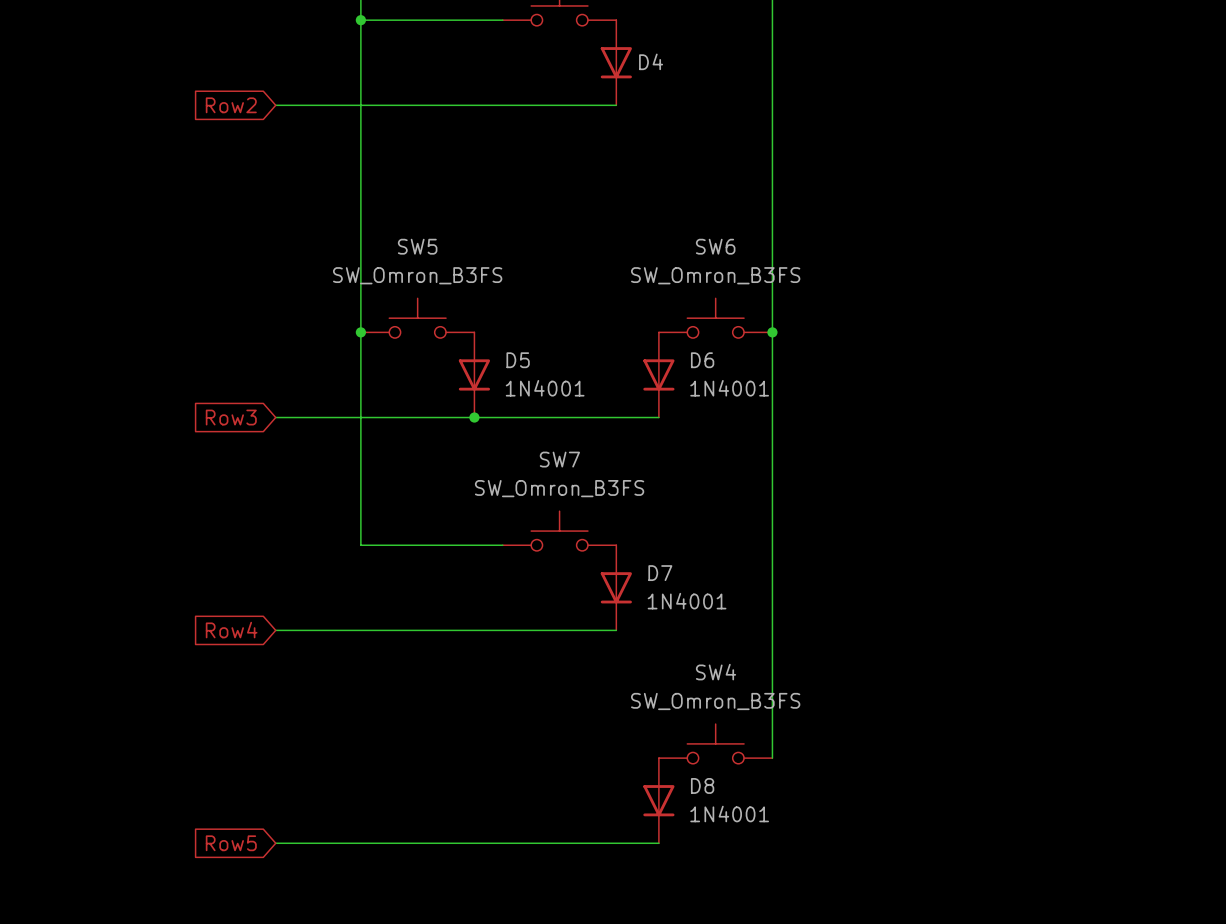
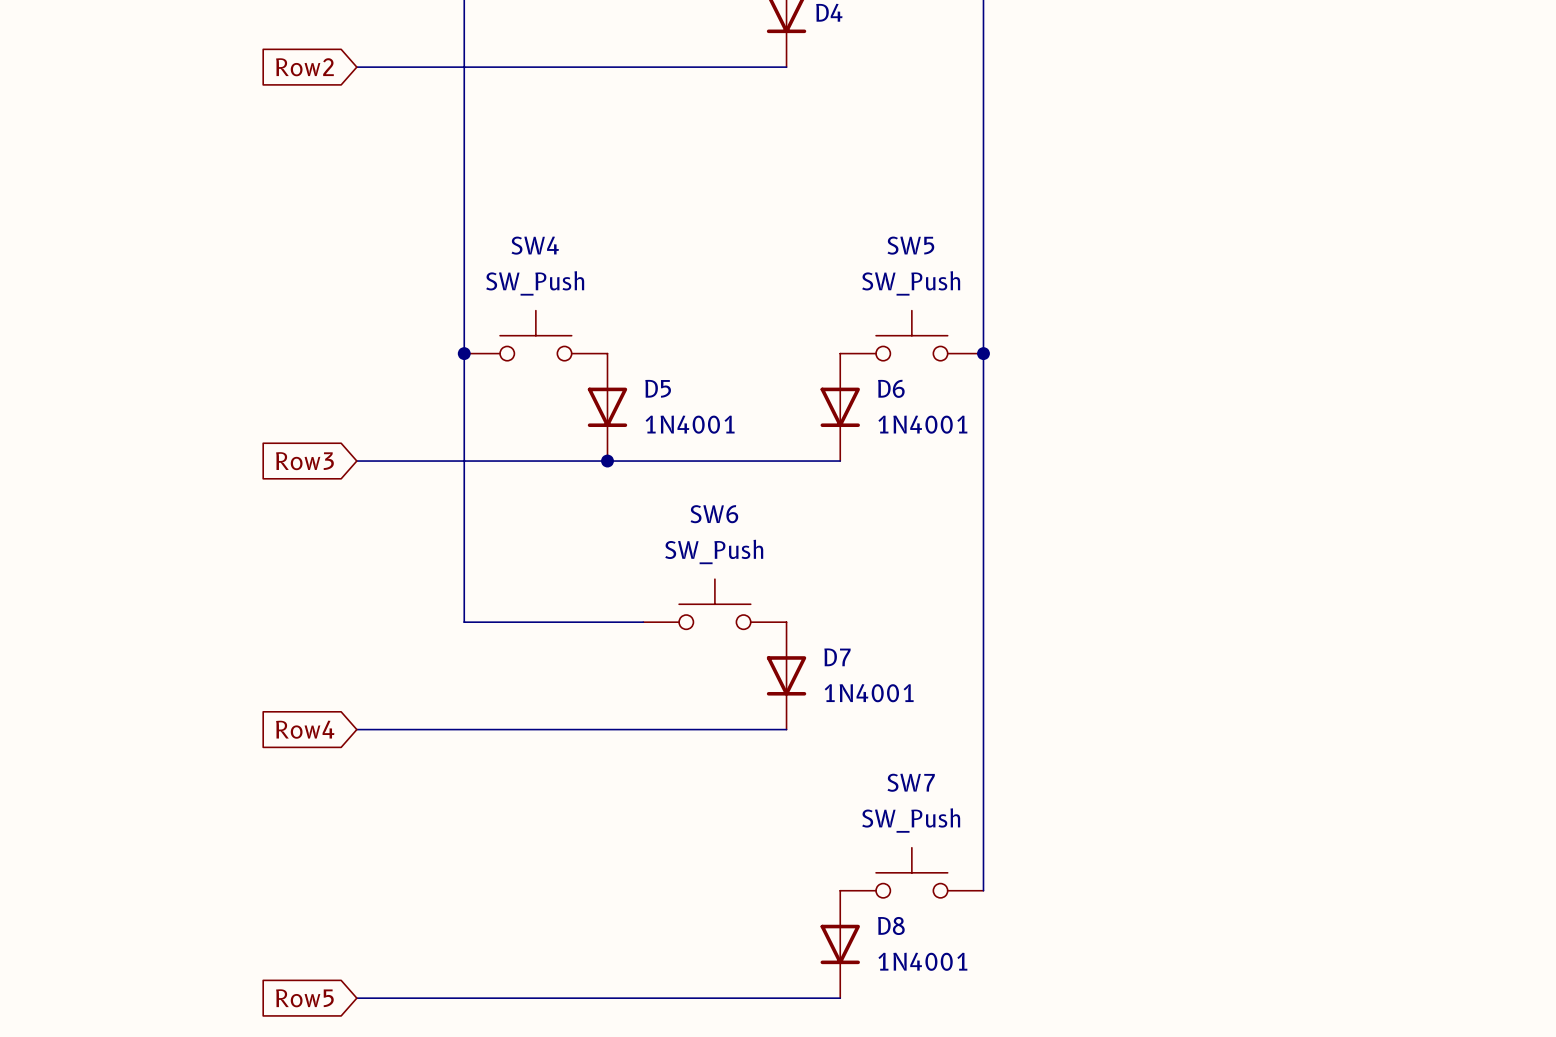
SW5 name: SW5 (417, 246) -> SW4 (535, 245)
SW6 name: SW6 (715, 246) -> SW5 (910, 245)
SW5 value: SW_Omron_B3FS (417, 275) -> SW_Push (535, 283)
SW6 value: SW_Omron_B3FS (715, 275) -> SW_Push (911, 283)
SW7 name: SW7 (559, 459) -> SW6 (714, 514)
SW7 value: SW_Omron_B3FS (559, 488) -> SW_Push (714, 551)
SW4 name: SW4 (716, 672) -> SW7 (911, 782)
SW4 value: SW_Omron_B3FS (715, 701) -> SW_Push (911, 820)

